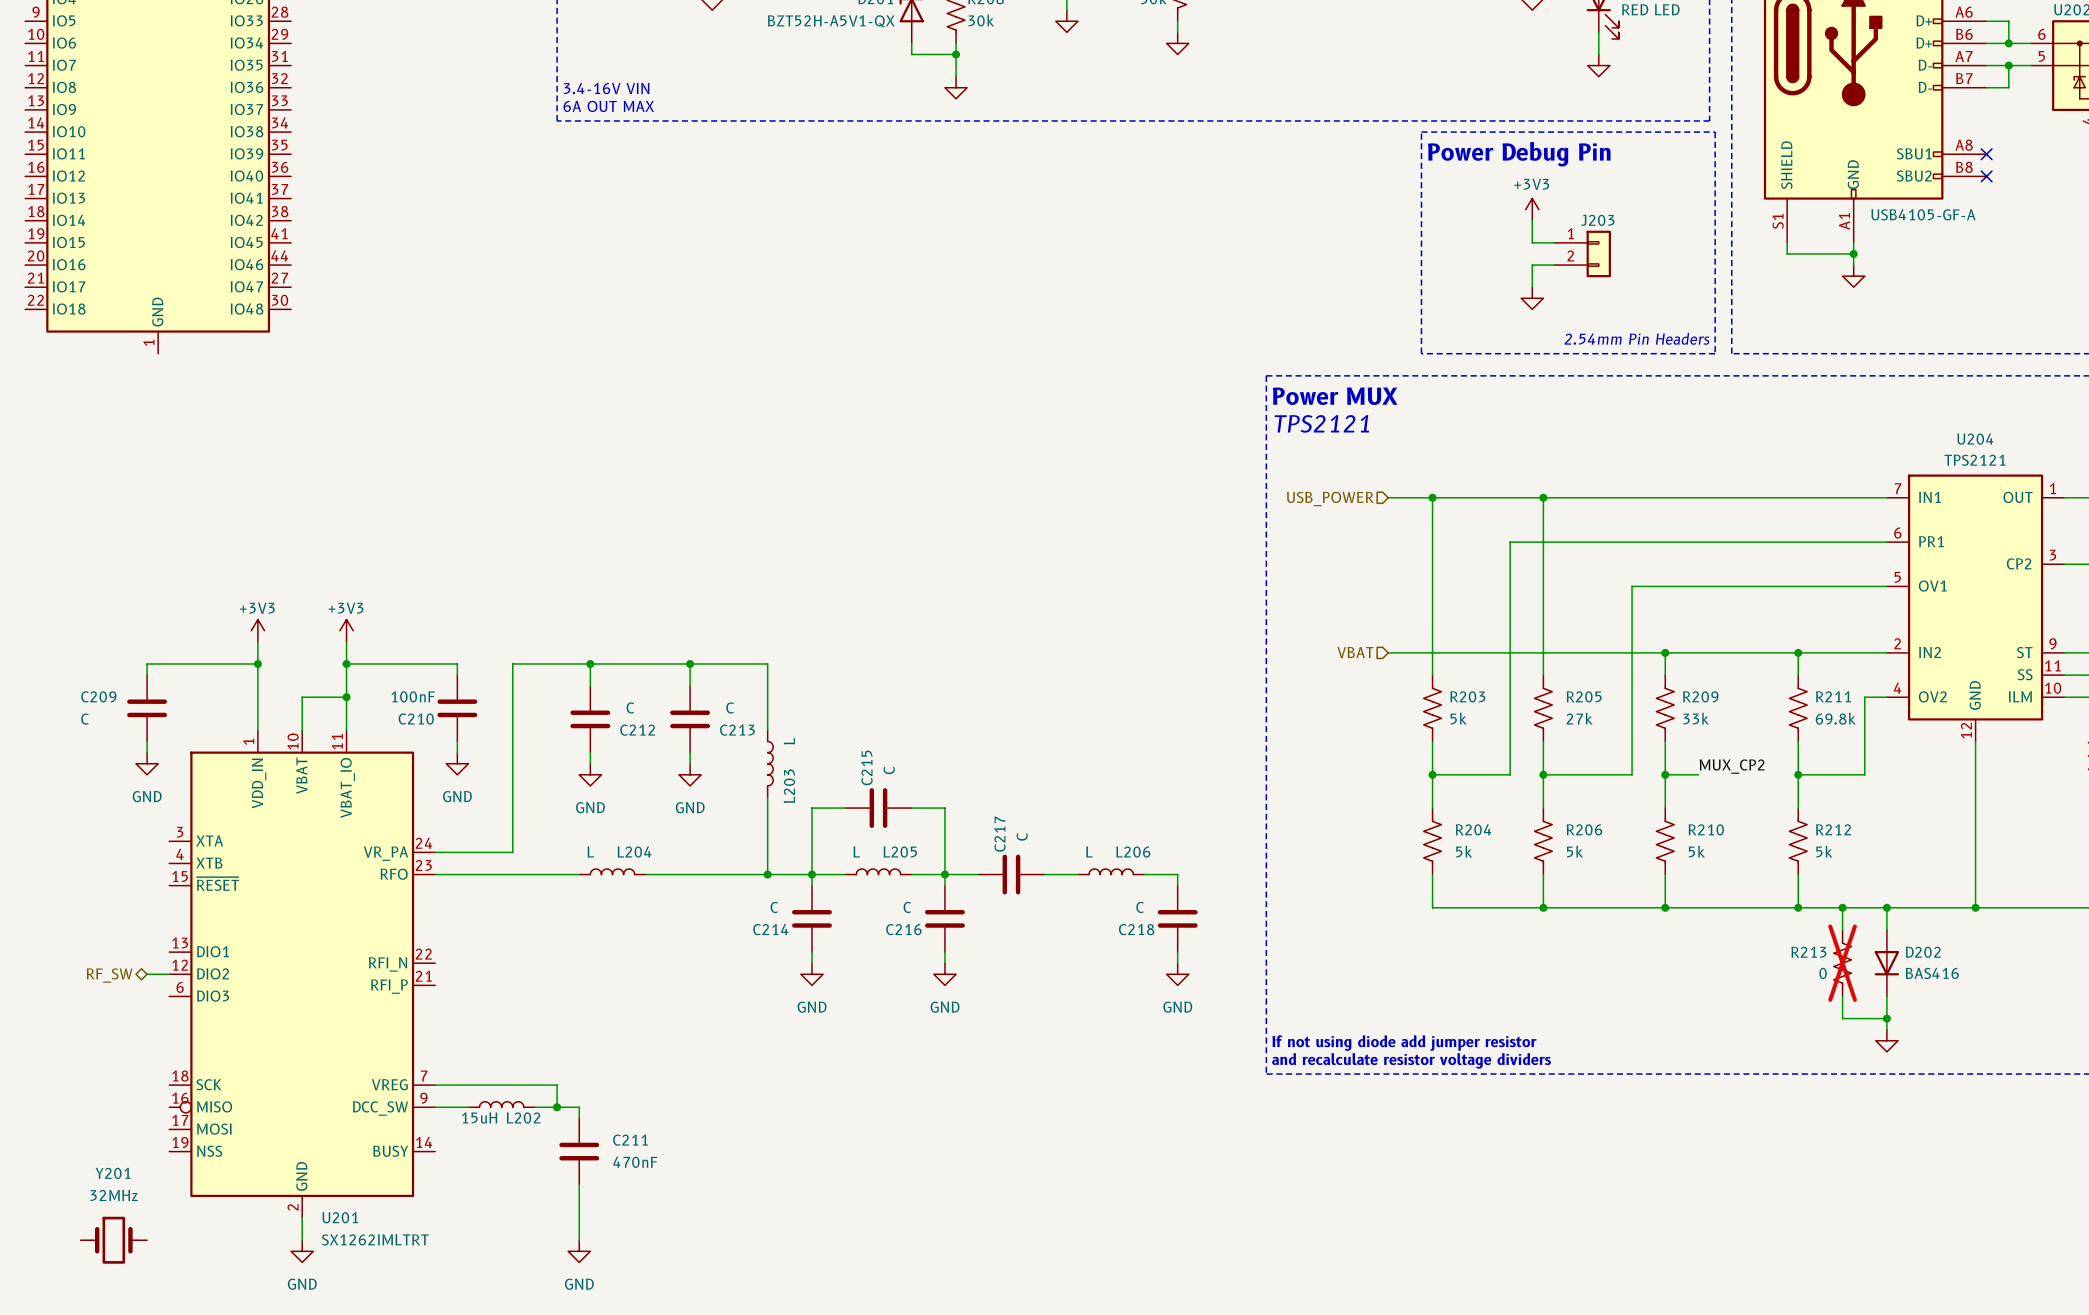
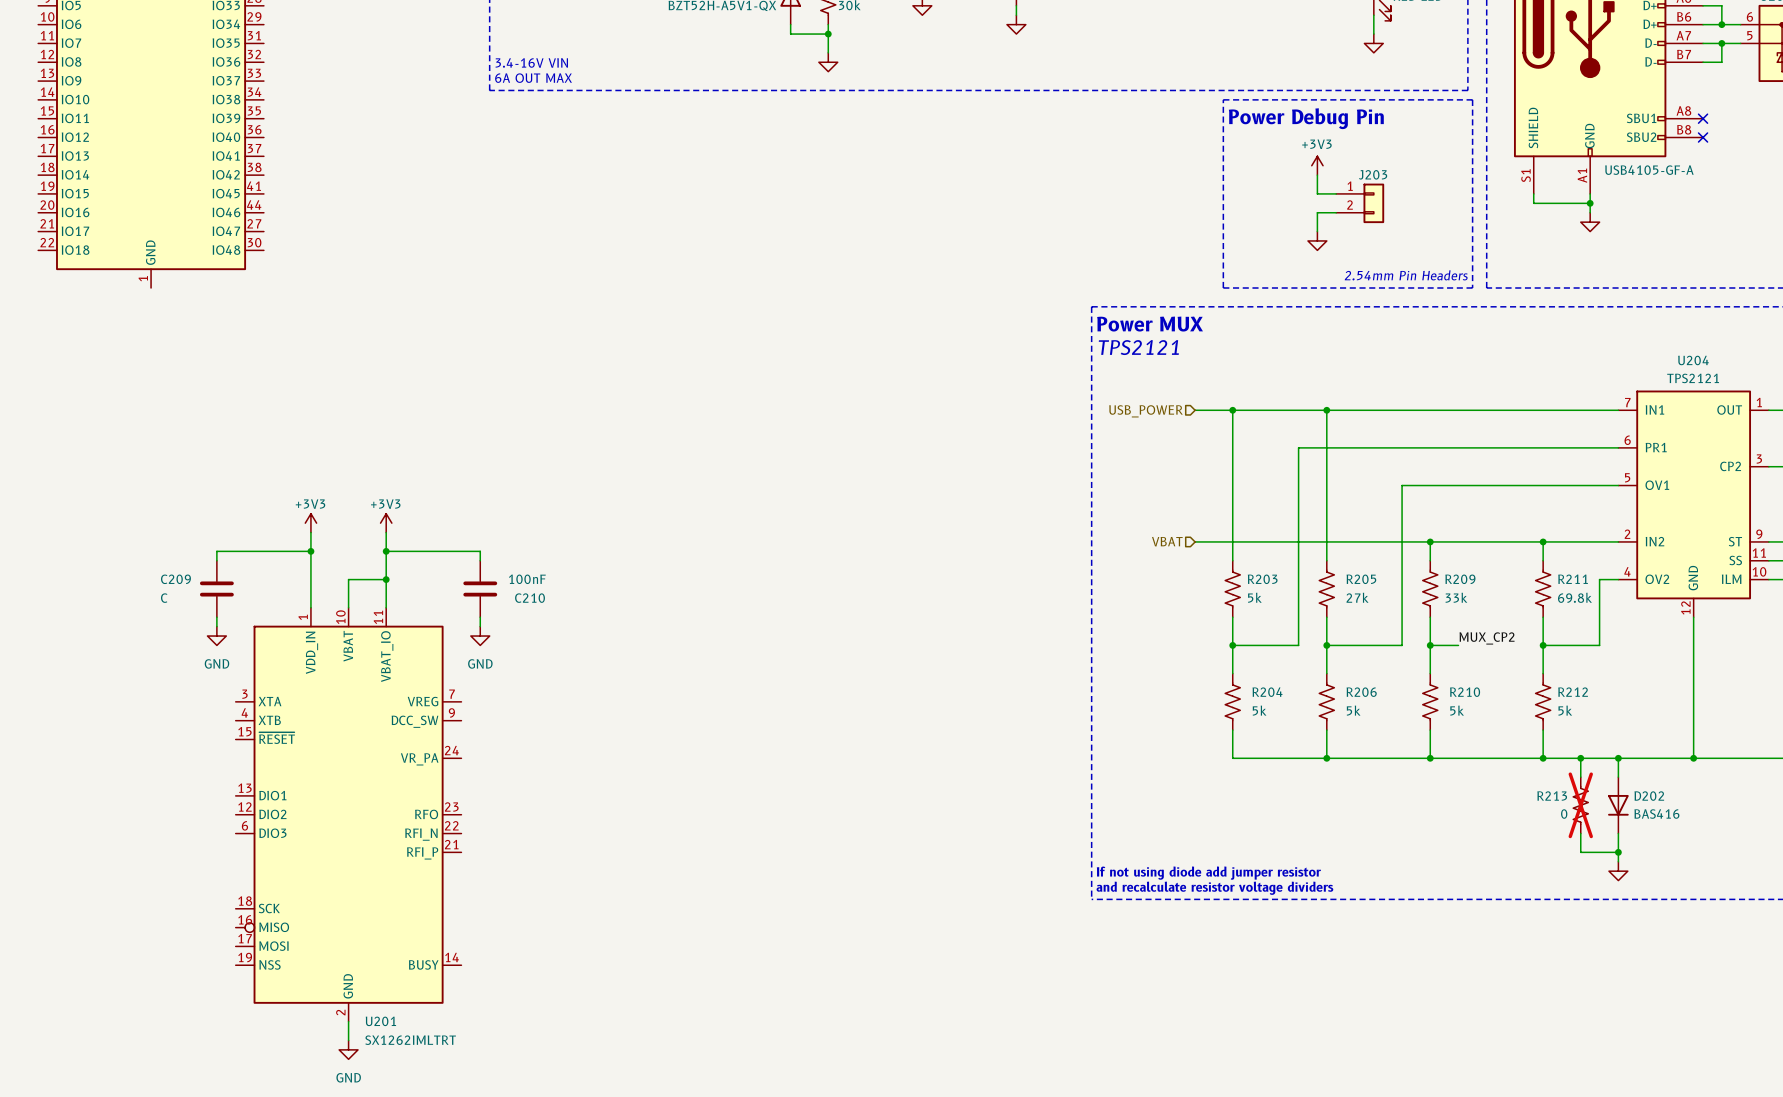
power symbol position: +3V3 (257, 630) -> +3V3 (386, 523)
wire: (257, 641) (257, 730) -> (386, 532) (386, 607)
wire: (235, 663) (147, 663) (147, 675) -> (216, 551) (216, 560)
junction: (257, 663) -> none
wire: (346, 663) (435, 663) -> (310, 551) (235, 551)
junction: none -> (386, 551)
wire: (457, 663) (457, 675) -> (405, 551) (452, 551)
wire: (512, 663) (512, 852) (435, 852) -> none
wire: (546, 663) (767, 663) (767, 730) -> (480, 551) (480, 560)
wire: (590, 663) (590, 686) -> none
junction: (590, 663) -> none
wire: (690, 663) (690, 686) -> none
junction: (690, 663) -> none
C210 value position: 100nF (413, 696) -> 100nF (527, 579)
wire: (346, 697) (302, 697) (302, 730) -> (386, 579) (348, 579) (348, 607)
junction: (346, 697) -> none
junction: none -> (386, 579)
C209 position: (147, 708) -> (216, 588)
C210 position: (457, 708) -> (480, 588)
C210 name position: C210 (416, 719) -> C210 (530, 598)
C212: C (590, 719) -> none
C213: C (690, 719) -> none
U201 symbol: [169, 730, 436, 1219] -> [235, 607, 462, 1022]
wire: (147, 741) (147, 752) -> (216, 617) (216, 626)
wire: (457, 741) (457, 752) -> (480, 617) (480, 626)
wire: (590, 752) (590, 763) -> none
wire: (690, 752) (690, 763) -> none
power symbol position: GND (147, 763) -> GND (216, 636)
power symbol: GND (457, 763) -> none
power symbol: none -> GND (480, 636)
L203: L (770, 763) -> none
power symbol: GND (590, 774) -> none
power symbol: GND (690, 774) -> none
wire: (767, 796) (767, 874) -> none
wire: (845, 808) (811, 808) (811, 885) -> none
C215: C (878, 808) -> none
wire: (911, 808) (944, 808) (944, 885) -> none
L204: L (612, 871) -> none
L205: L (878, 871) -> none
L206: L (1111, 871) -> none
wire: (435, 874) (579, 874) -> none
wire: (645, 874) (845, 874) -> none
junction: (767, 874) -> none
junction: (811, 874) -> none
wire: (911, 874) (978, 874) -> none
junction: (944, 874) -> none
C217: C (1011, 874) -> none
wire: (1044, 874) (1077, 874) -> none
wire: (1144, 874) (1177, 874) (1177, 885) -> none
C214: C (811, 918) -> none
C216: C (944, 918) -> none
C218: C (1177, 918) -> none
wire: (811, 952) (811, 963) -> none
wire: (944, 952) (944, 963) -> none
wire: (1177, 952) (1177, 963) -> none
wire: (147, 974) (169, 974) -> none
power symbol: GND (811, 974) -> none
power symbol: GND (944, 974) -> none
power symbol: GND (1177, 974) -> none
hierarchical label: RF_SW (109, 975) -> none
wire: (435, 1085) (557, 1085) (557, 1107) -> none
L202: 15uH (501, 1104) -> none
wire: (534, 1107) (579, 1107) (579, 1118) -> none
junction: (557, 1107) -> none
C211: 470nF (579, 1151) -> none
wire: (579, 1184) (579, 1240) -> none
wire: (302, 1218) (302, 1240) -> (348, 1021) (348, 1040)
Y201: 32MHz (113, 1240) -> none
power symbol position: GND (302, 1251) -> GND (348, 1049)
power symbol: GND (579, 1251) -> none

